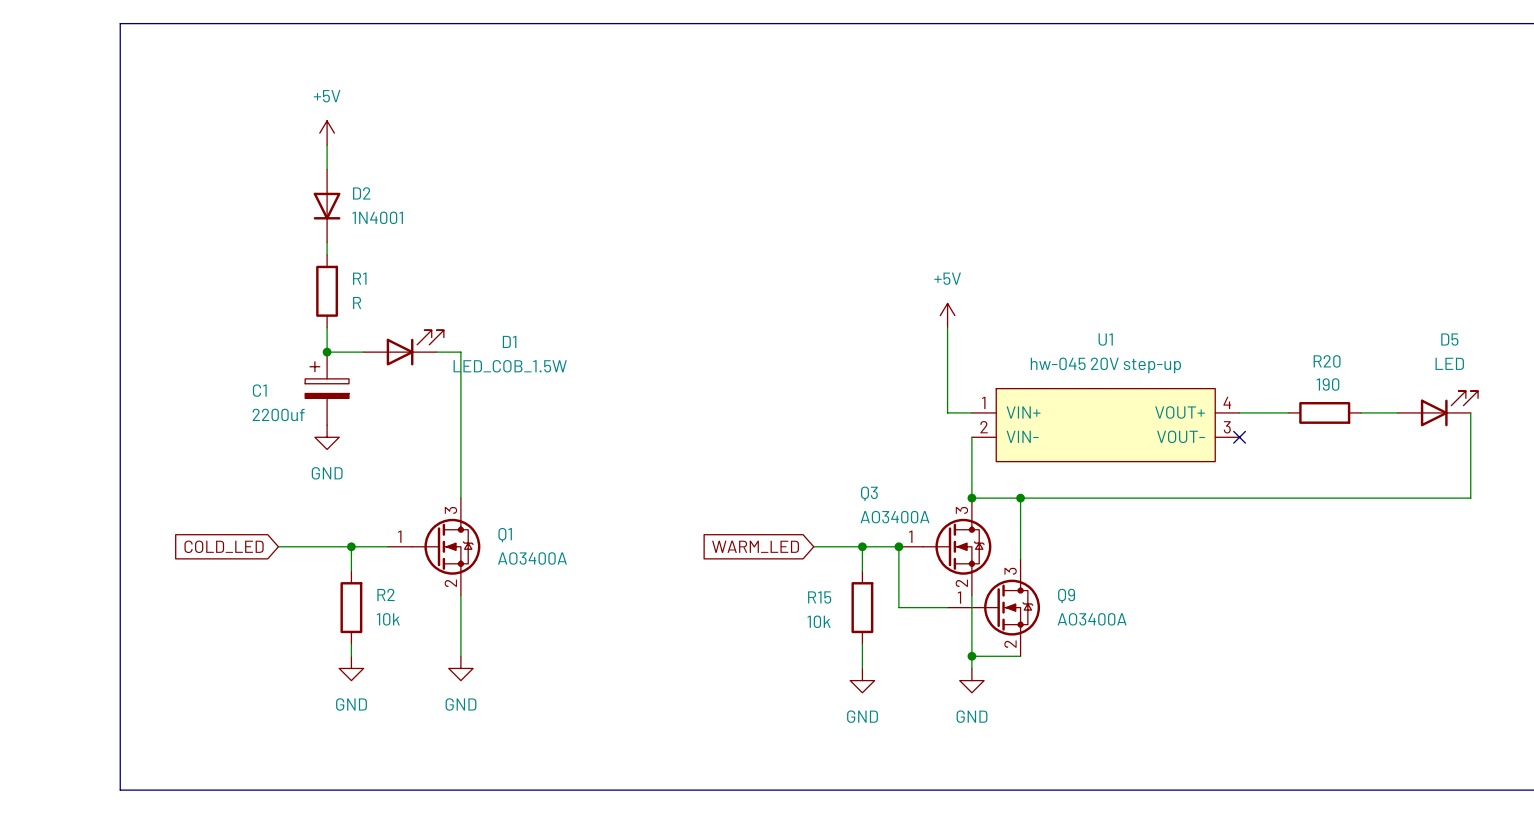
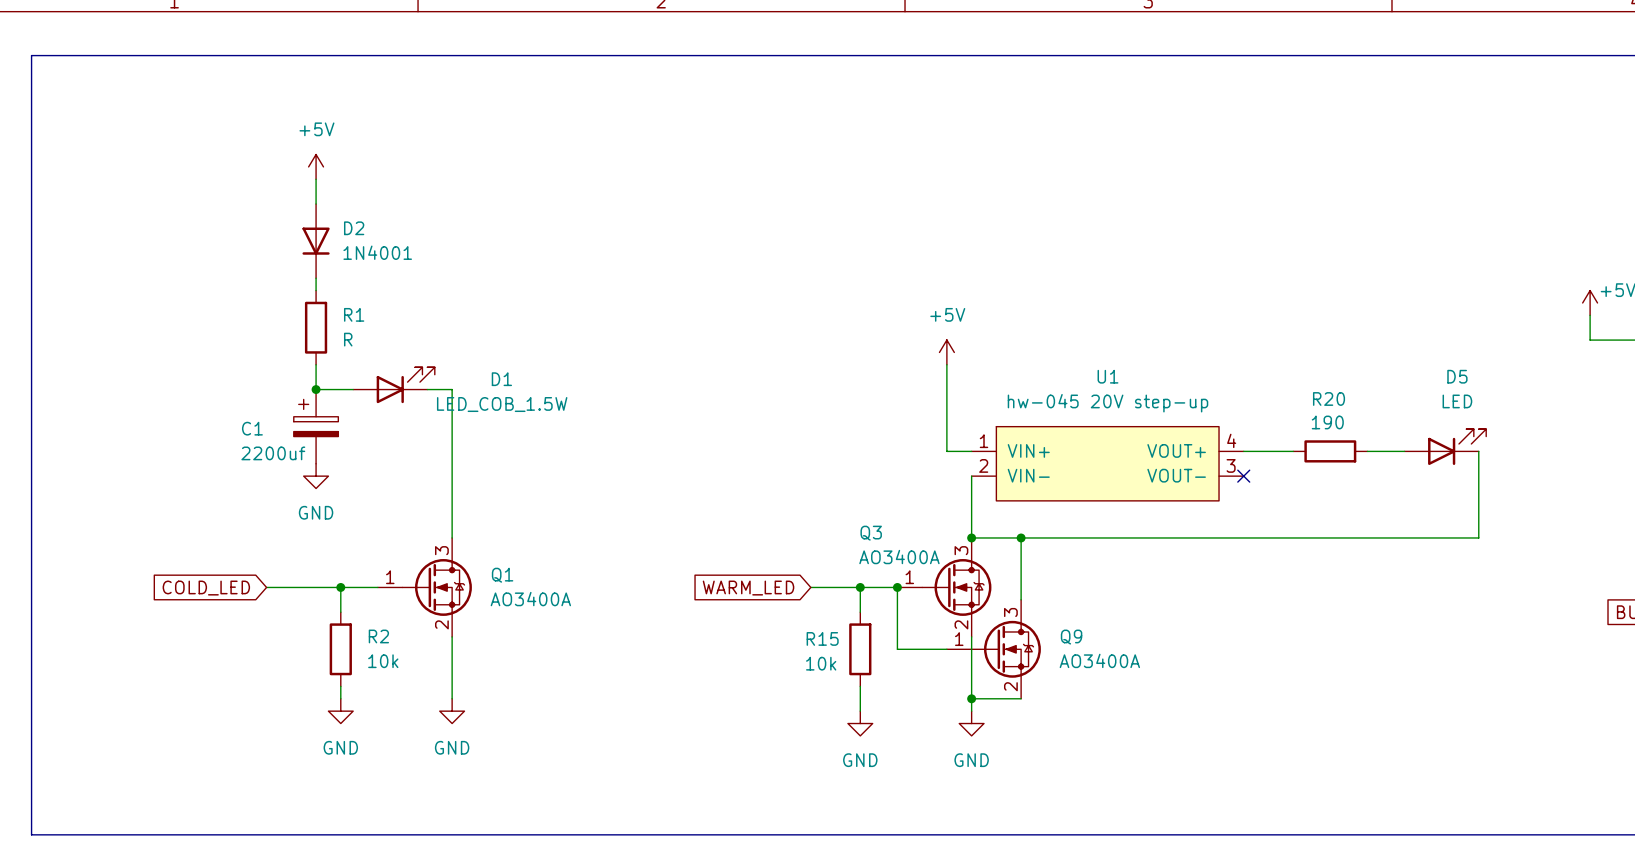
line: (120, 23) (120, 790) -> (105, 55) (31, 55) (31, 834) (105, 834)

